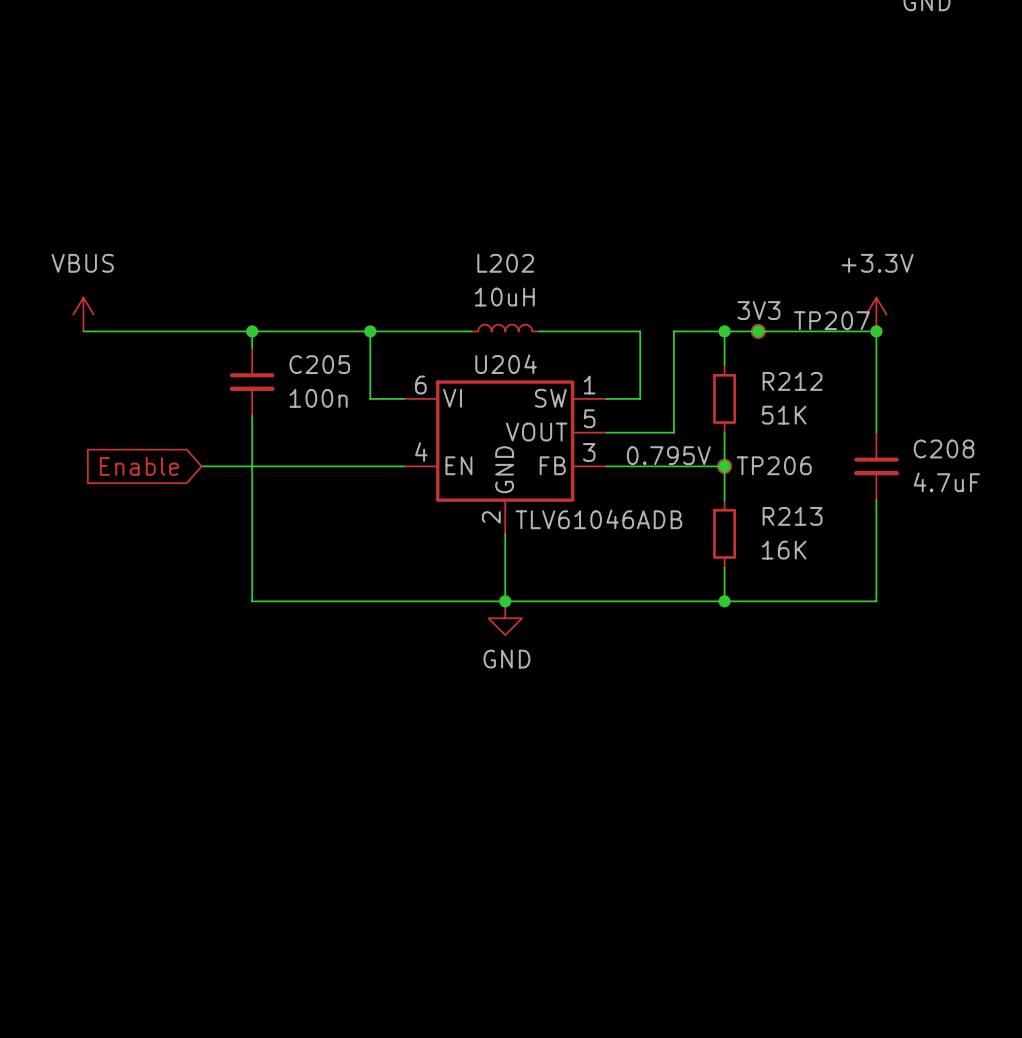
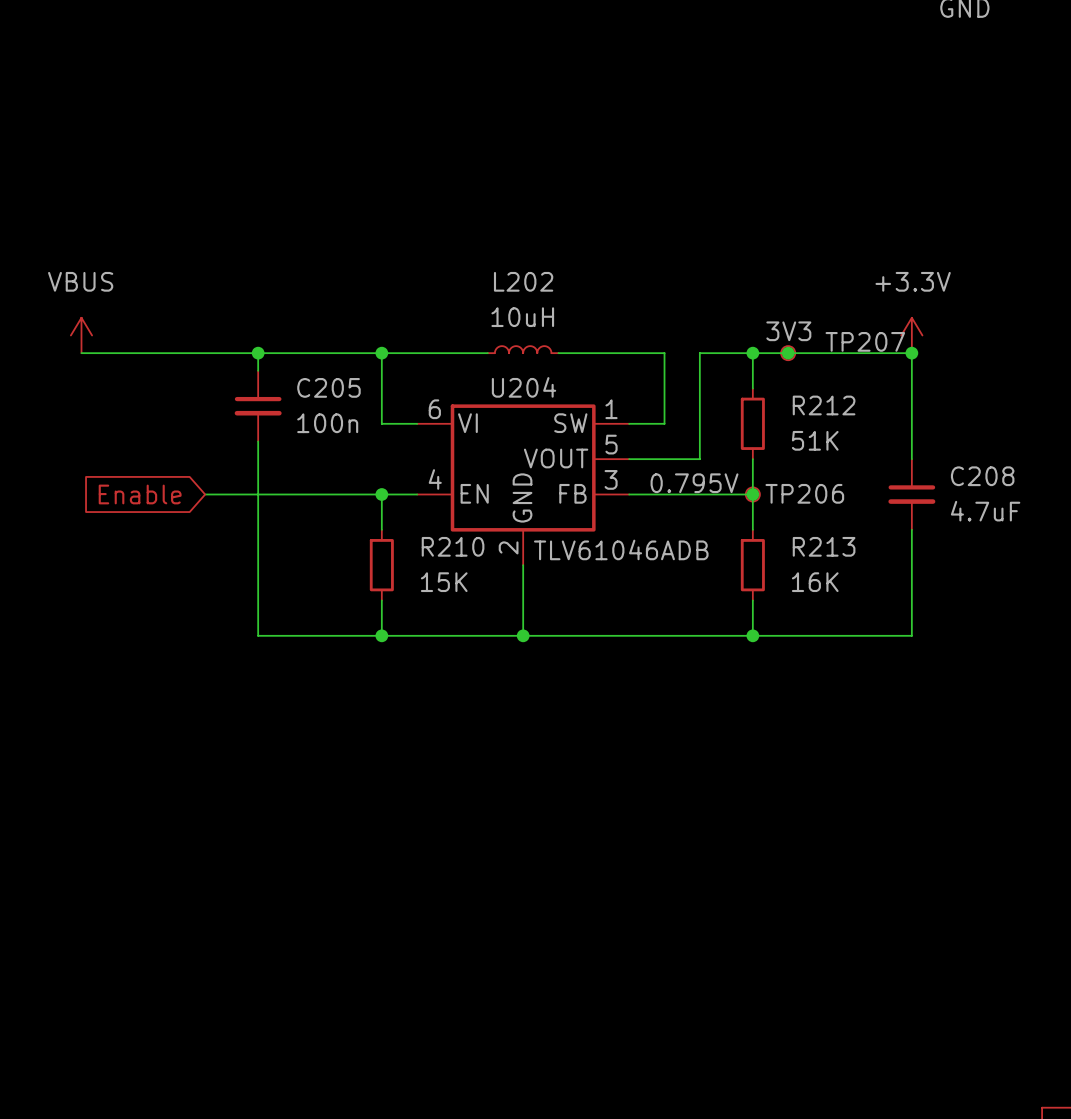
wire: none -> (381, 494) (381, 529)
junction: none -> (381, 494)
R210: none -> 15K (381, 565)
wire: none -> (381, 600) (381, 635)
junction: none -> (381, 635)
power symbol: GND (505, 618) -> none

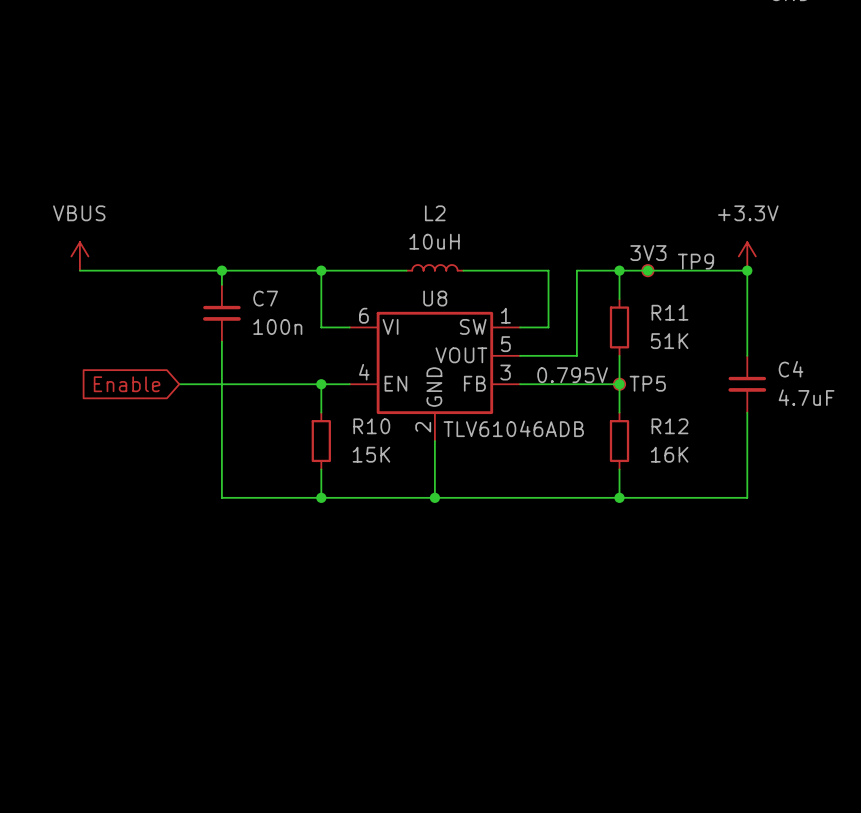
L202 name: L202 (523, 281) -> L2 (435, 213)
TP207 name: TP207 (865, 341) -> TP9 (696, 261)
C205 name: C205 (328, 387) -> C7 (265, 298)
U204 name: U204 (524, 387) -> U8 (435, 298)
R212 name: R212 (824, 405) -> R11 (669, 312)
C208 name: C208 (982, 476) -> C4 (791, 369)
TP206 name: TP206 (804, 493) -> TP5 (647, 383)
R210 name: R210 (453, 546) -> R10 (371, 426)
R213 name: R213 (824, 546) -> R12 (669, 426)

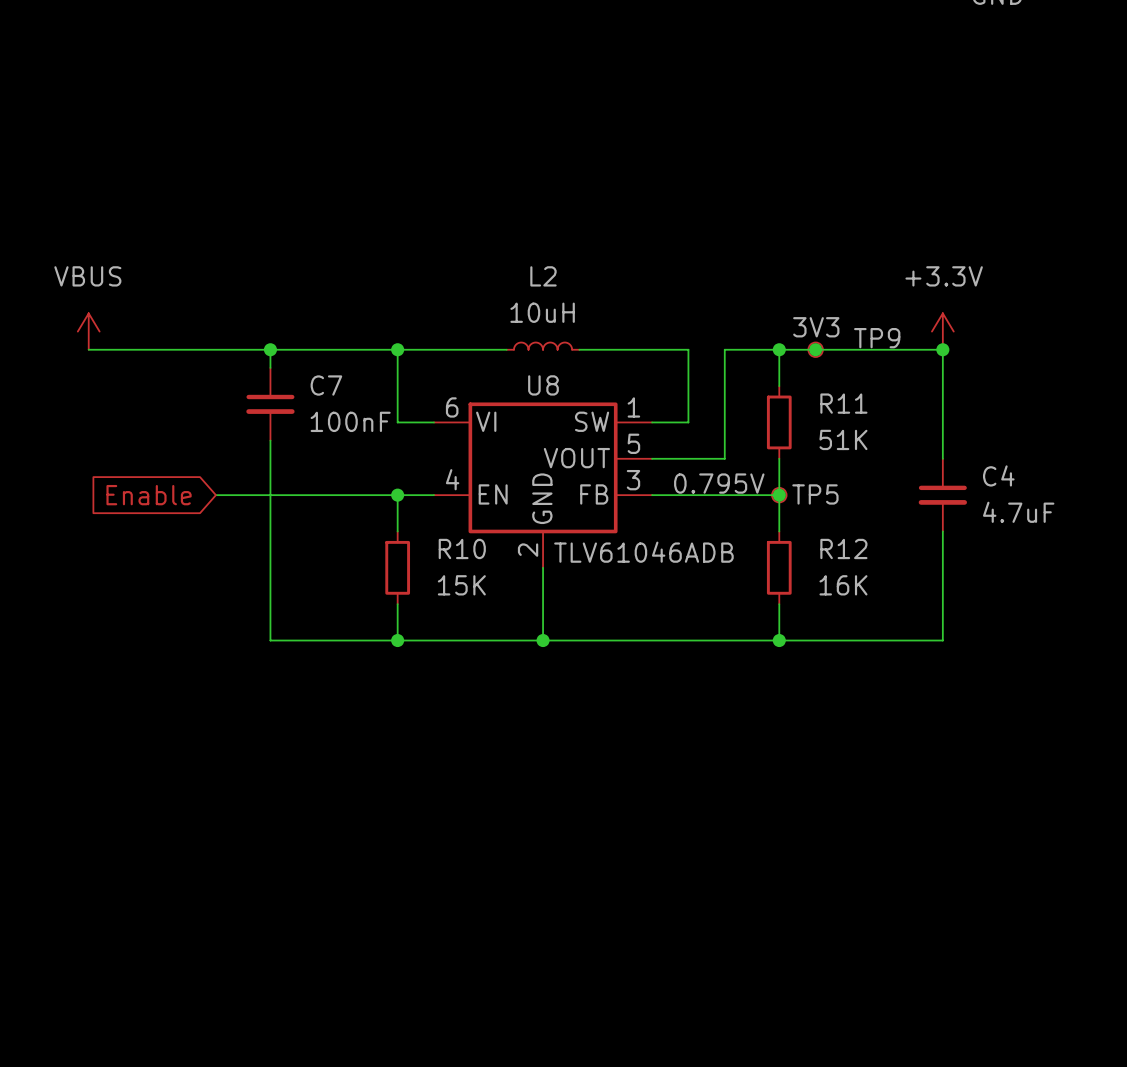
C7 value: 100n (277, 326) -> 100nF (350, 421)

